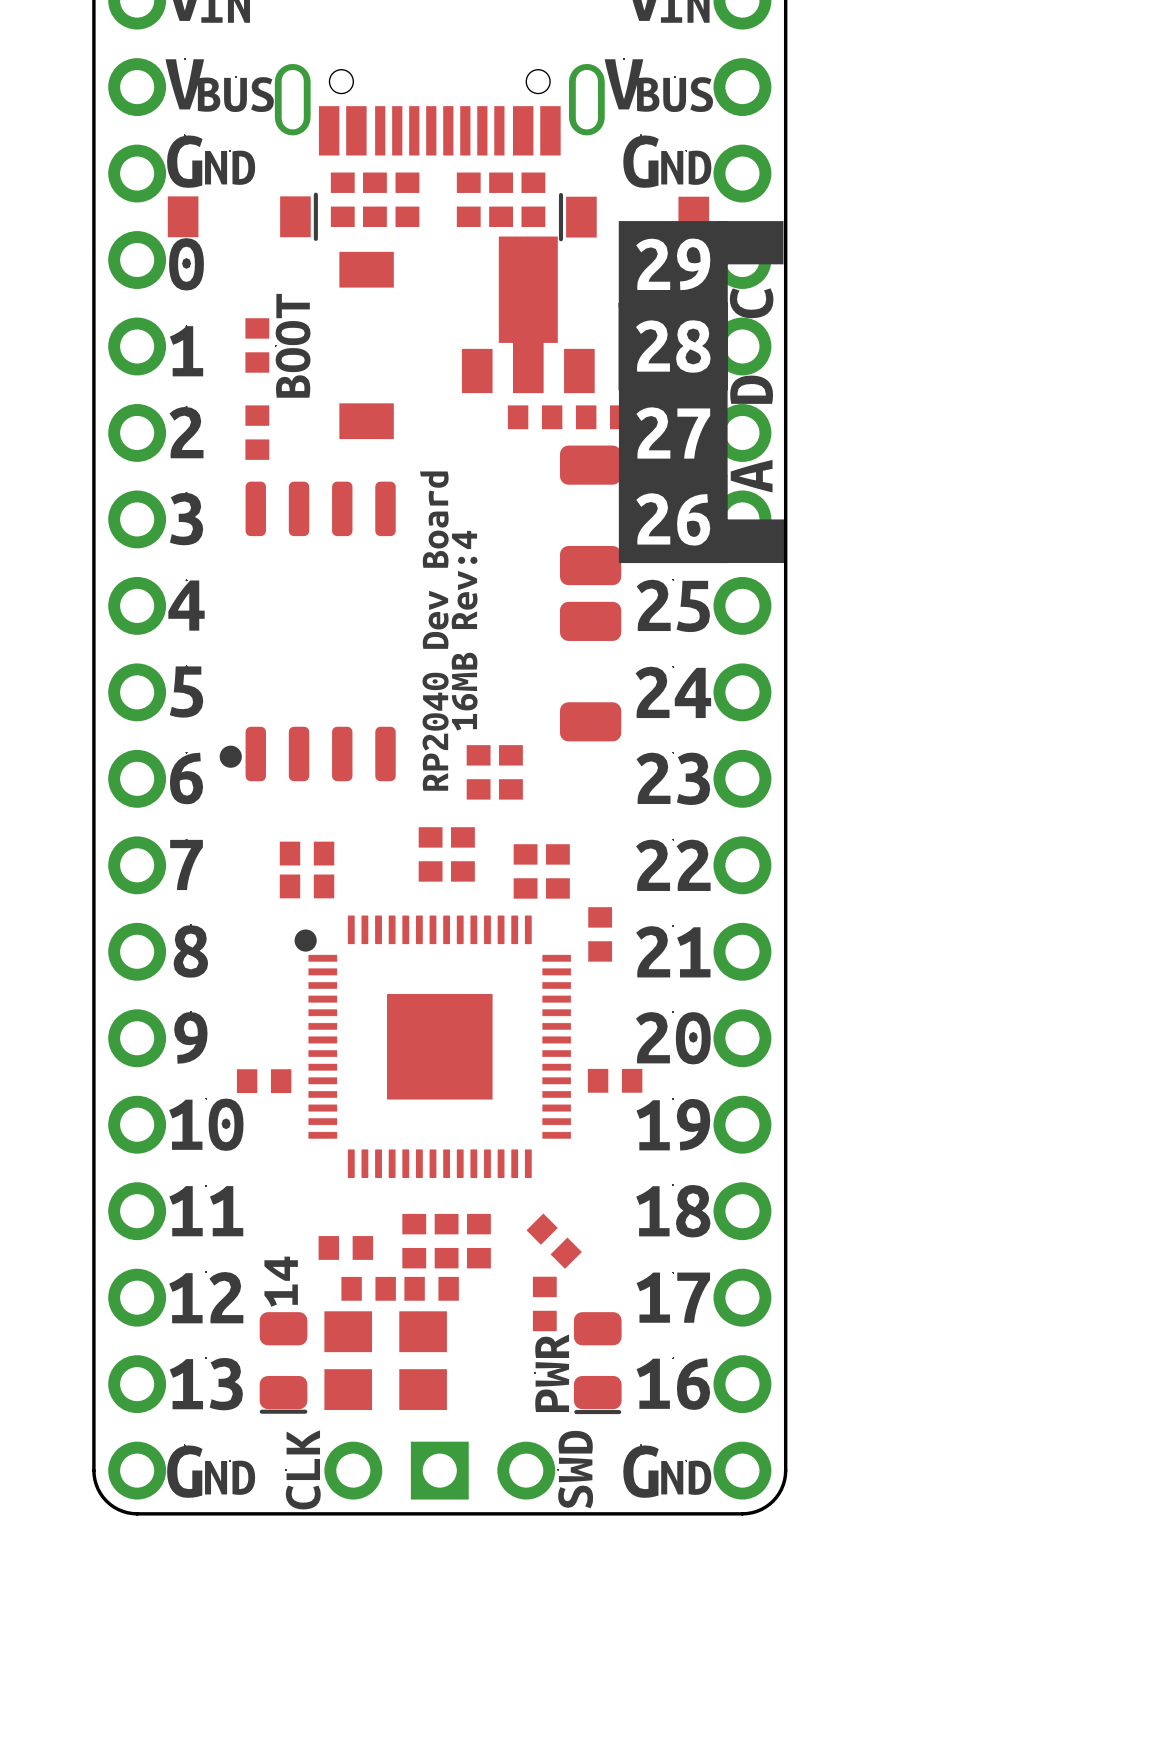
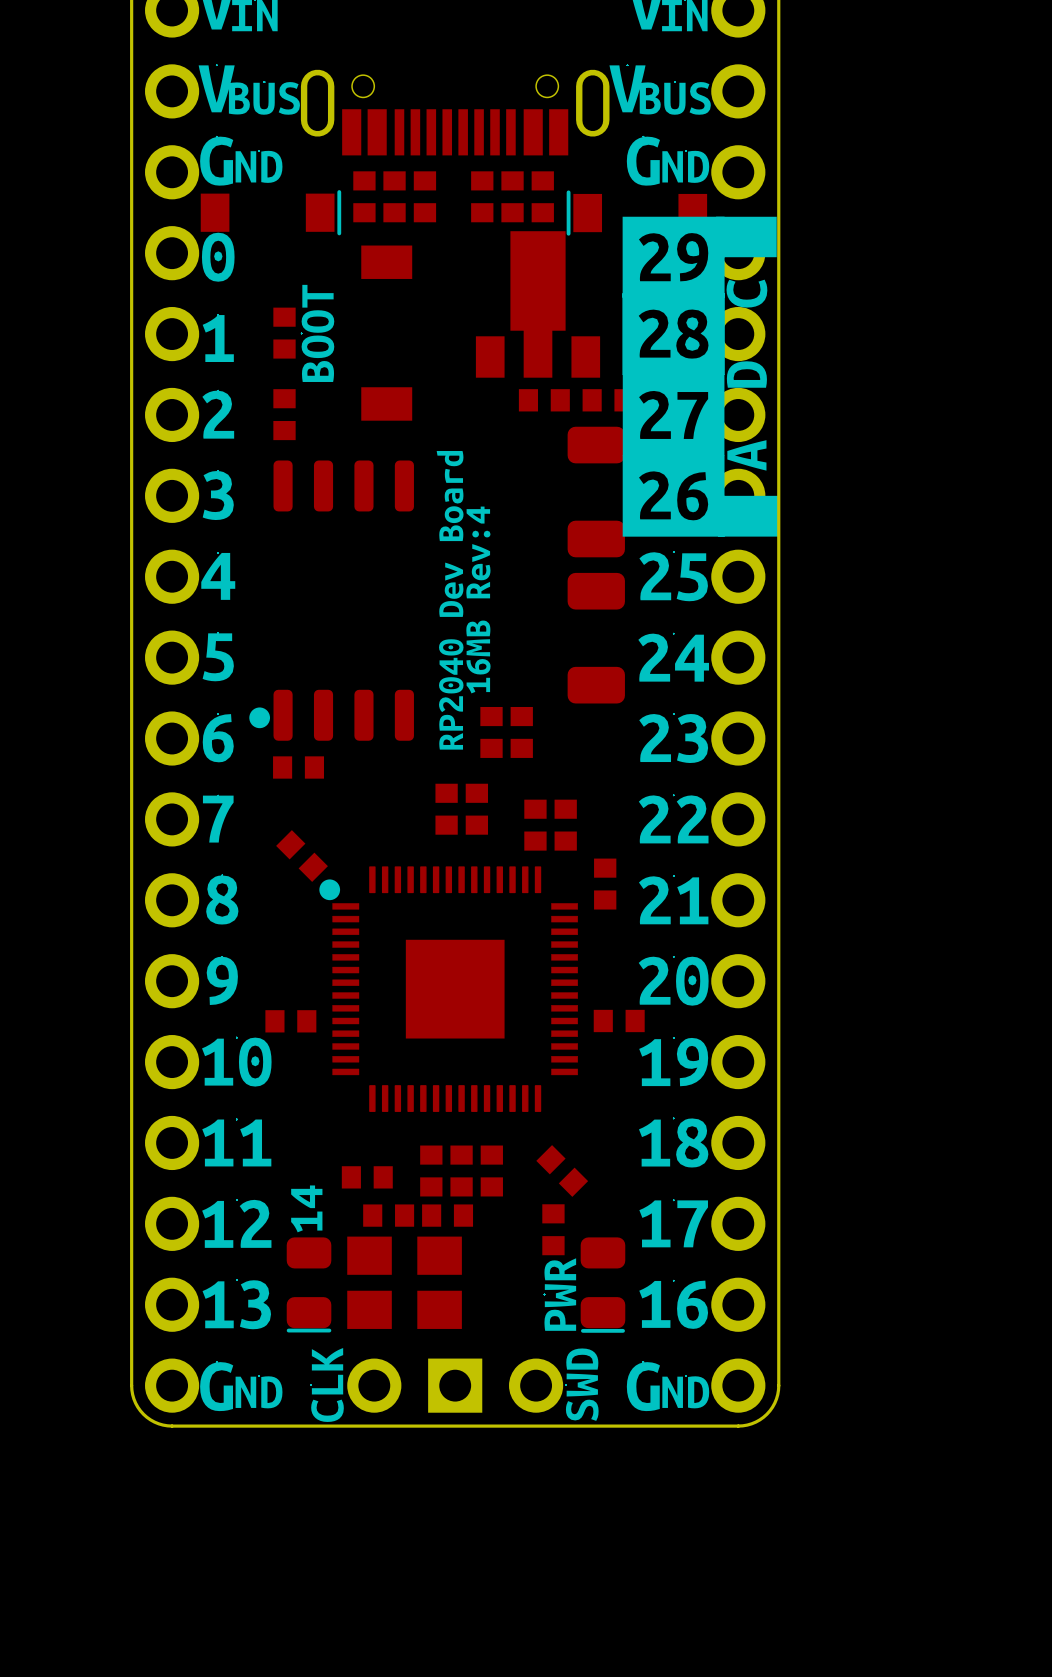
part: none -> (298, 767)
part: (307, 853) -> none
part: (307, 886) -> none
part: none -> (302, 856)

